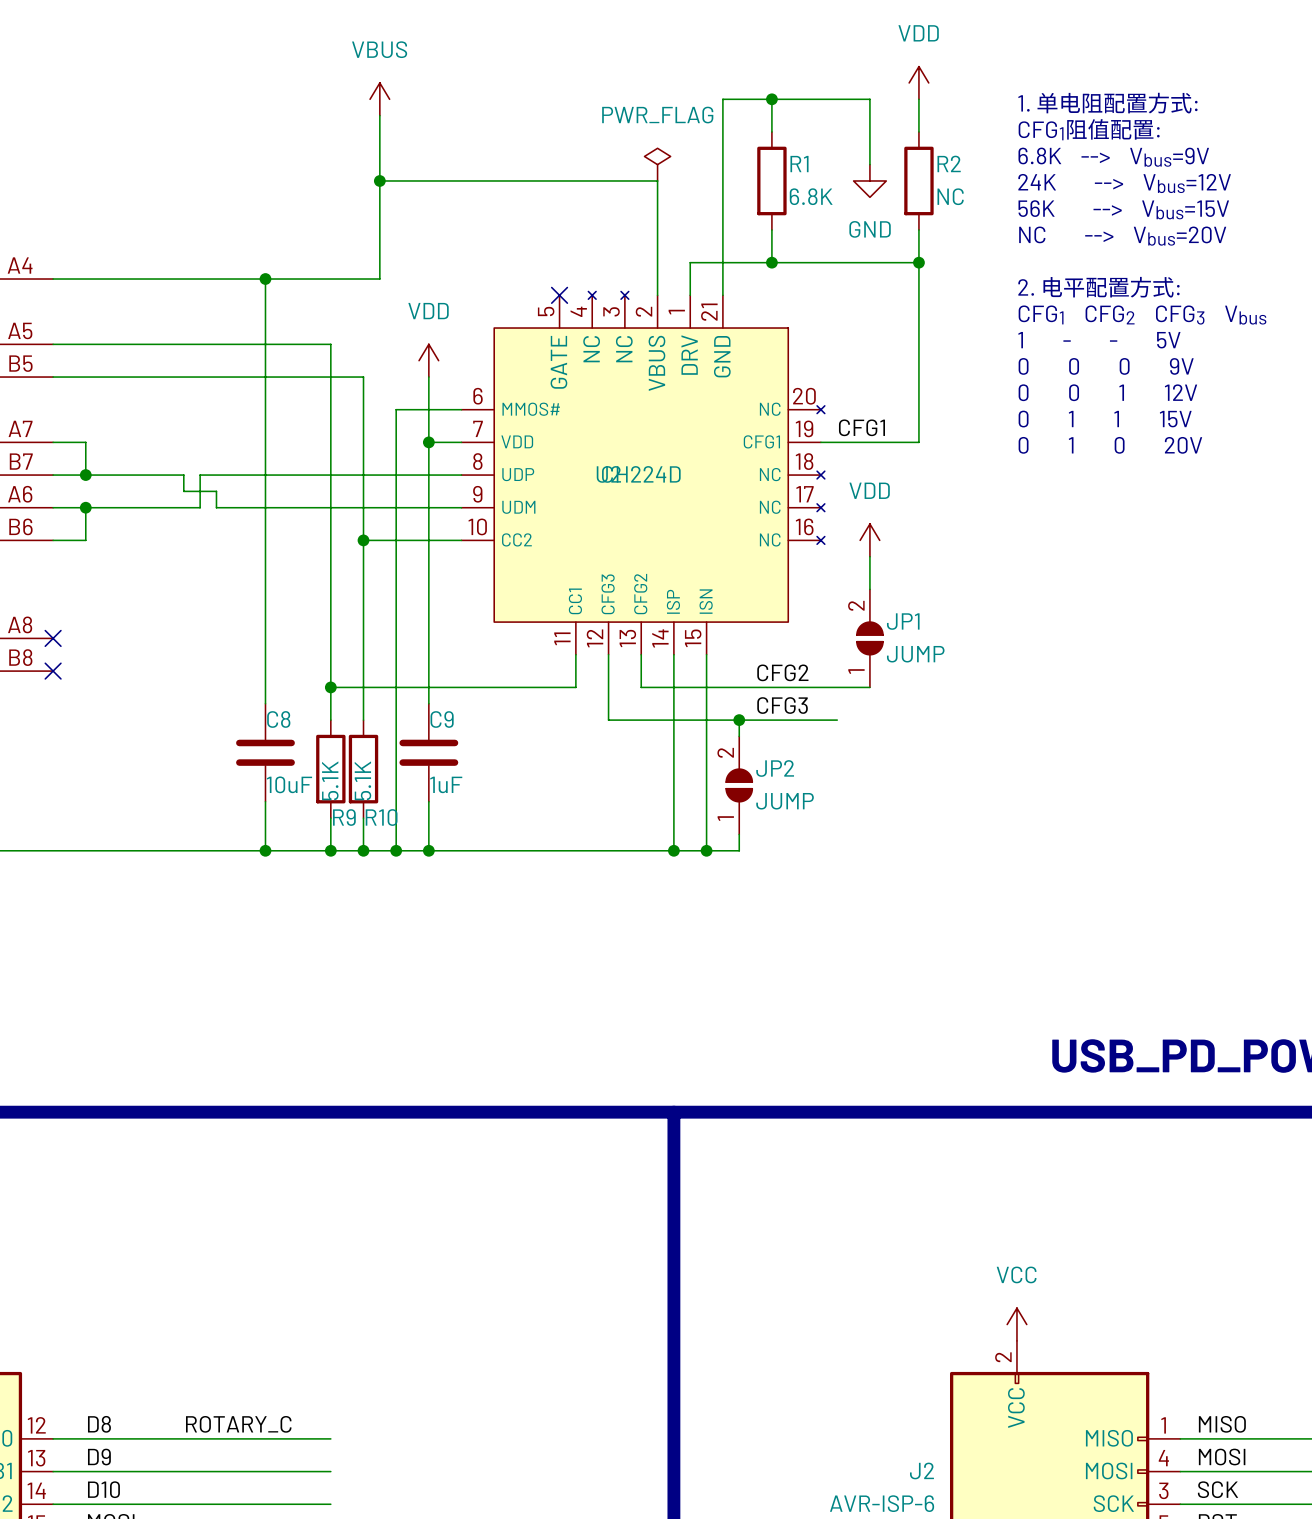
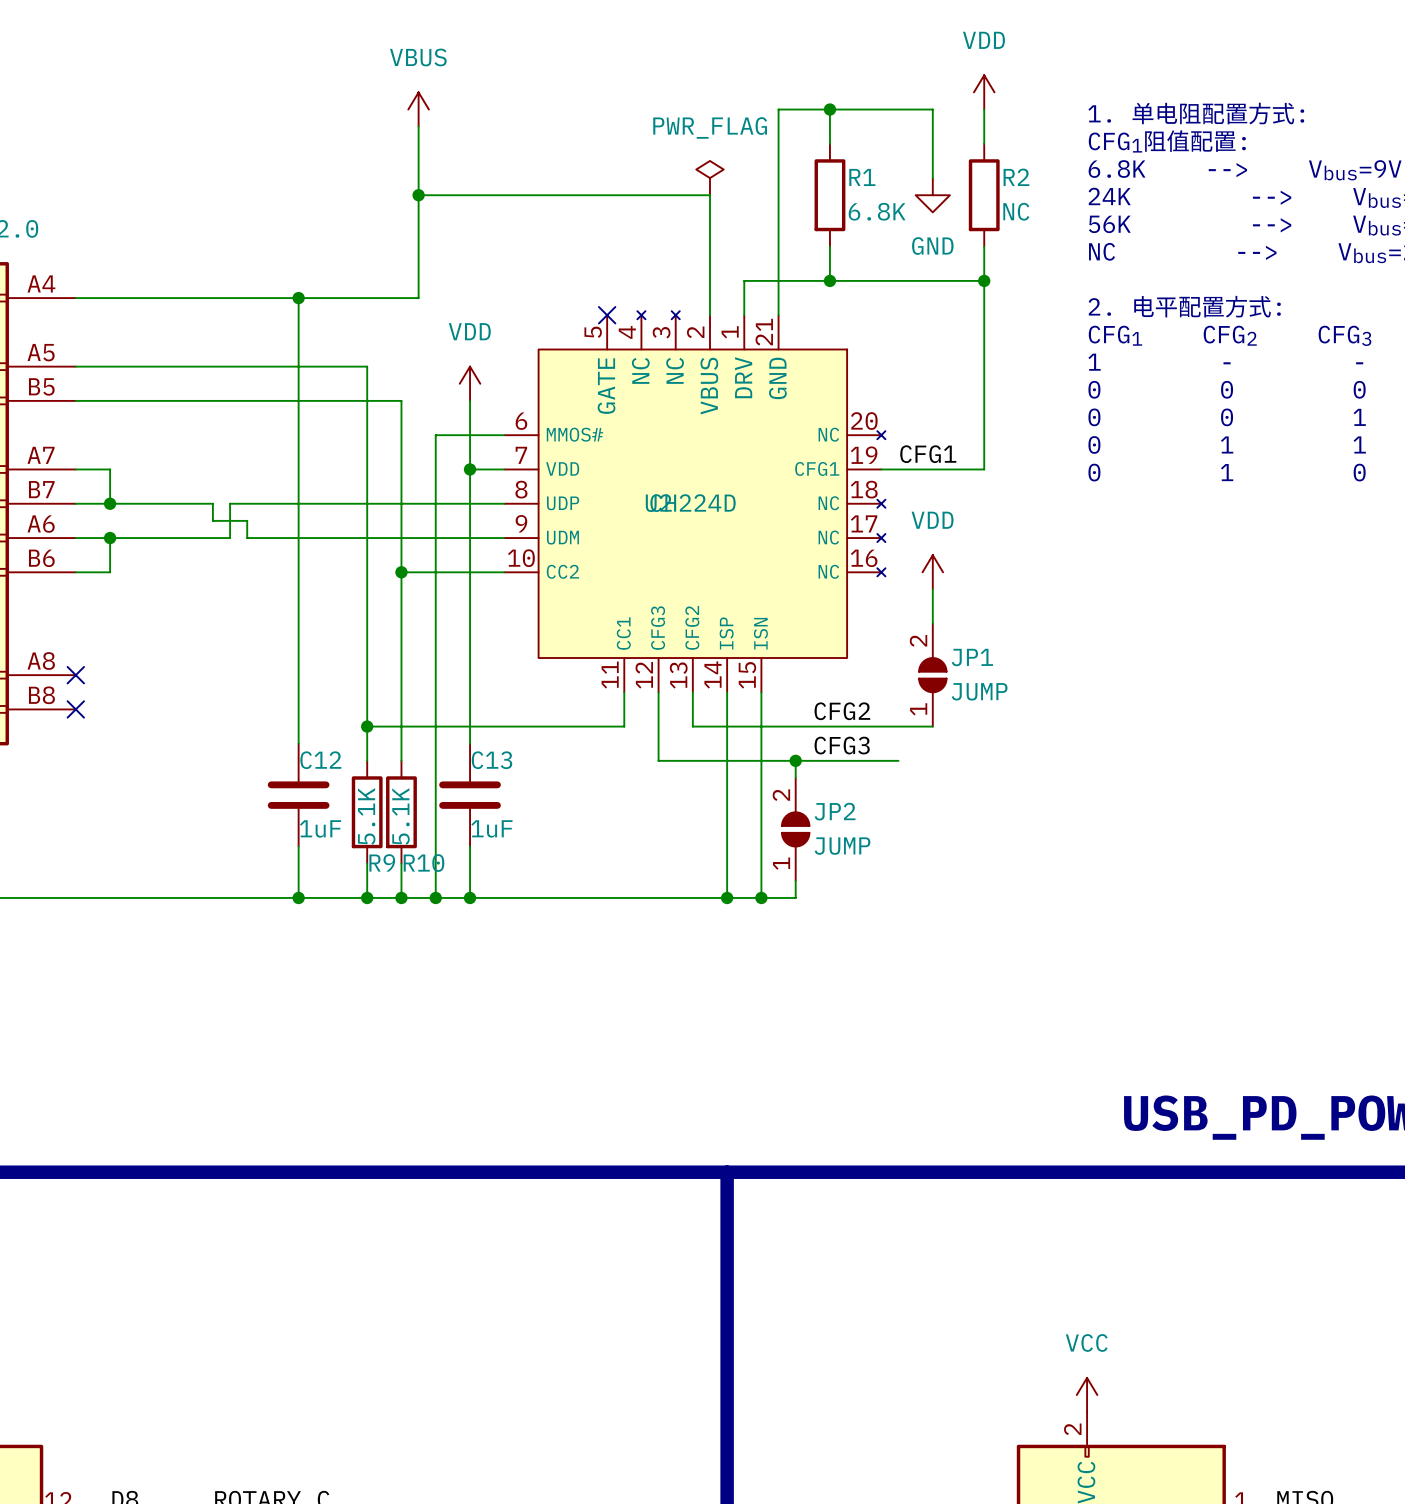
C8 name: C8 (278, 719) -> C12 (320, 760)
C9 name: C9 (442, 719) -> C13 (491, 760)
C8 value: 10uF (289, 784) -> 1uF (320, 828)

